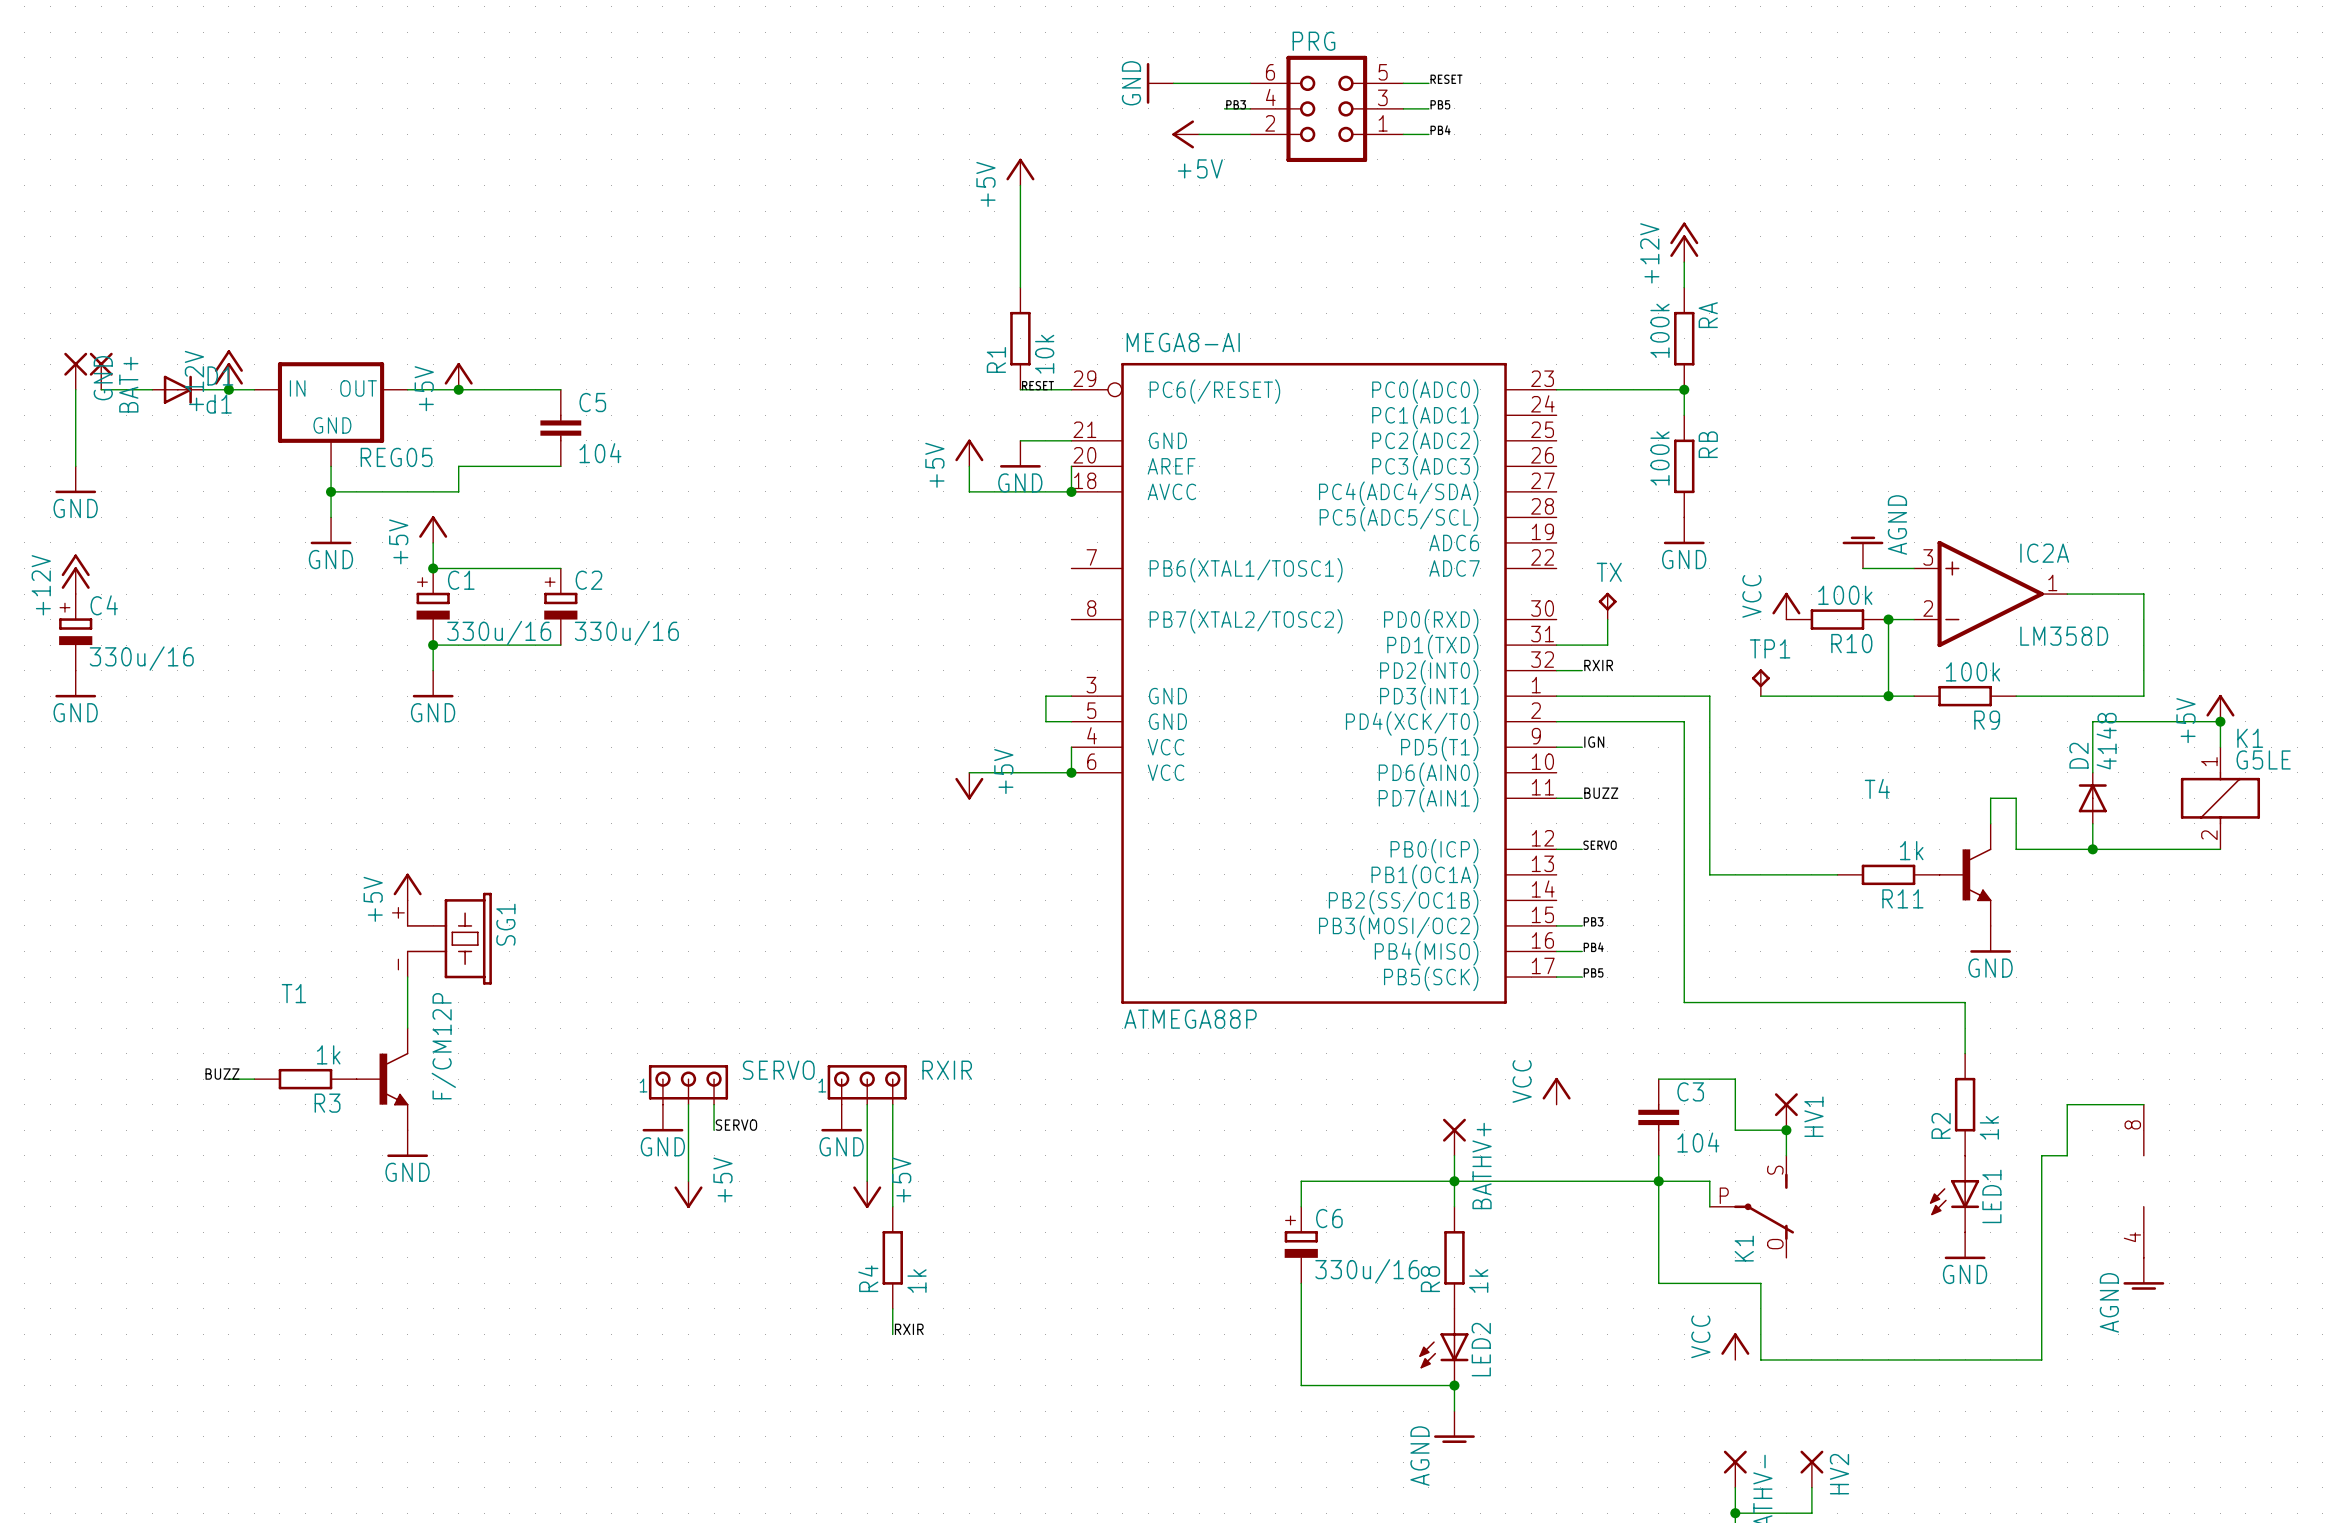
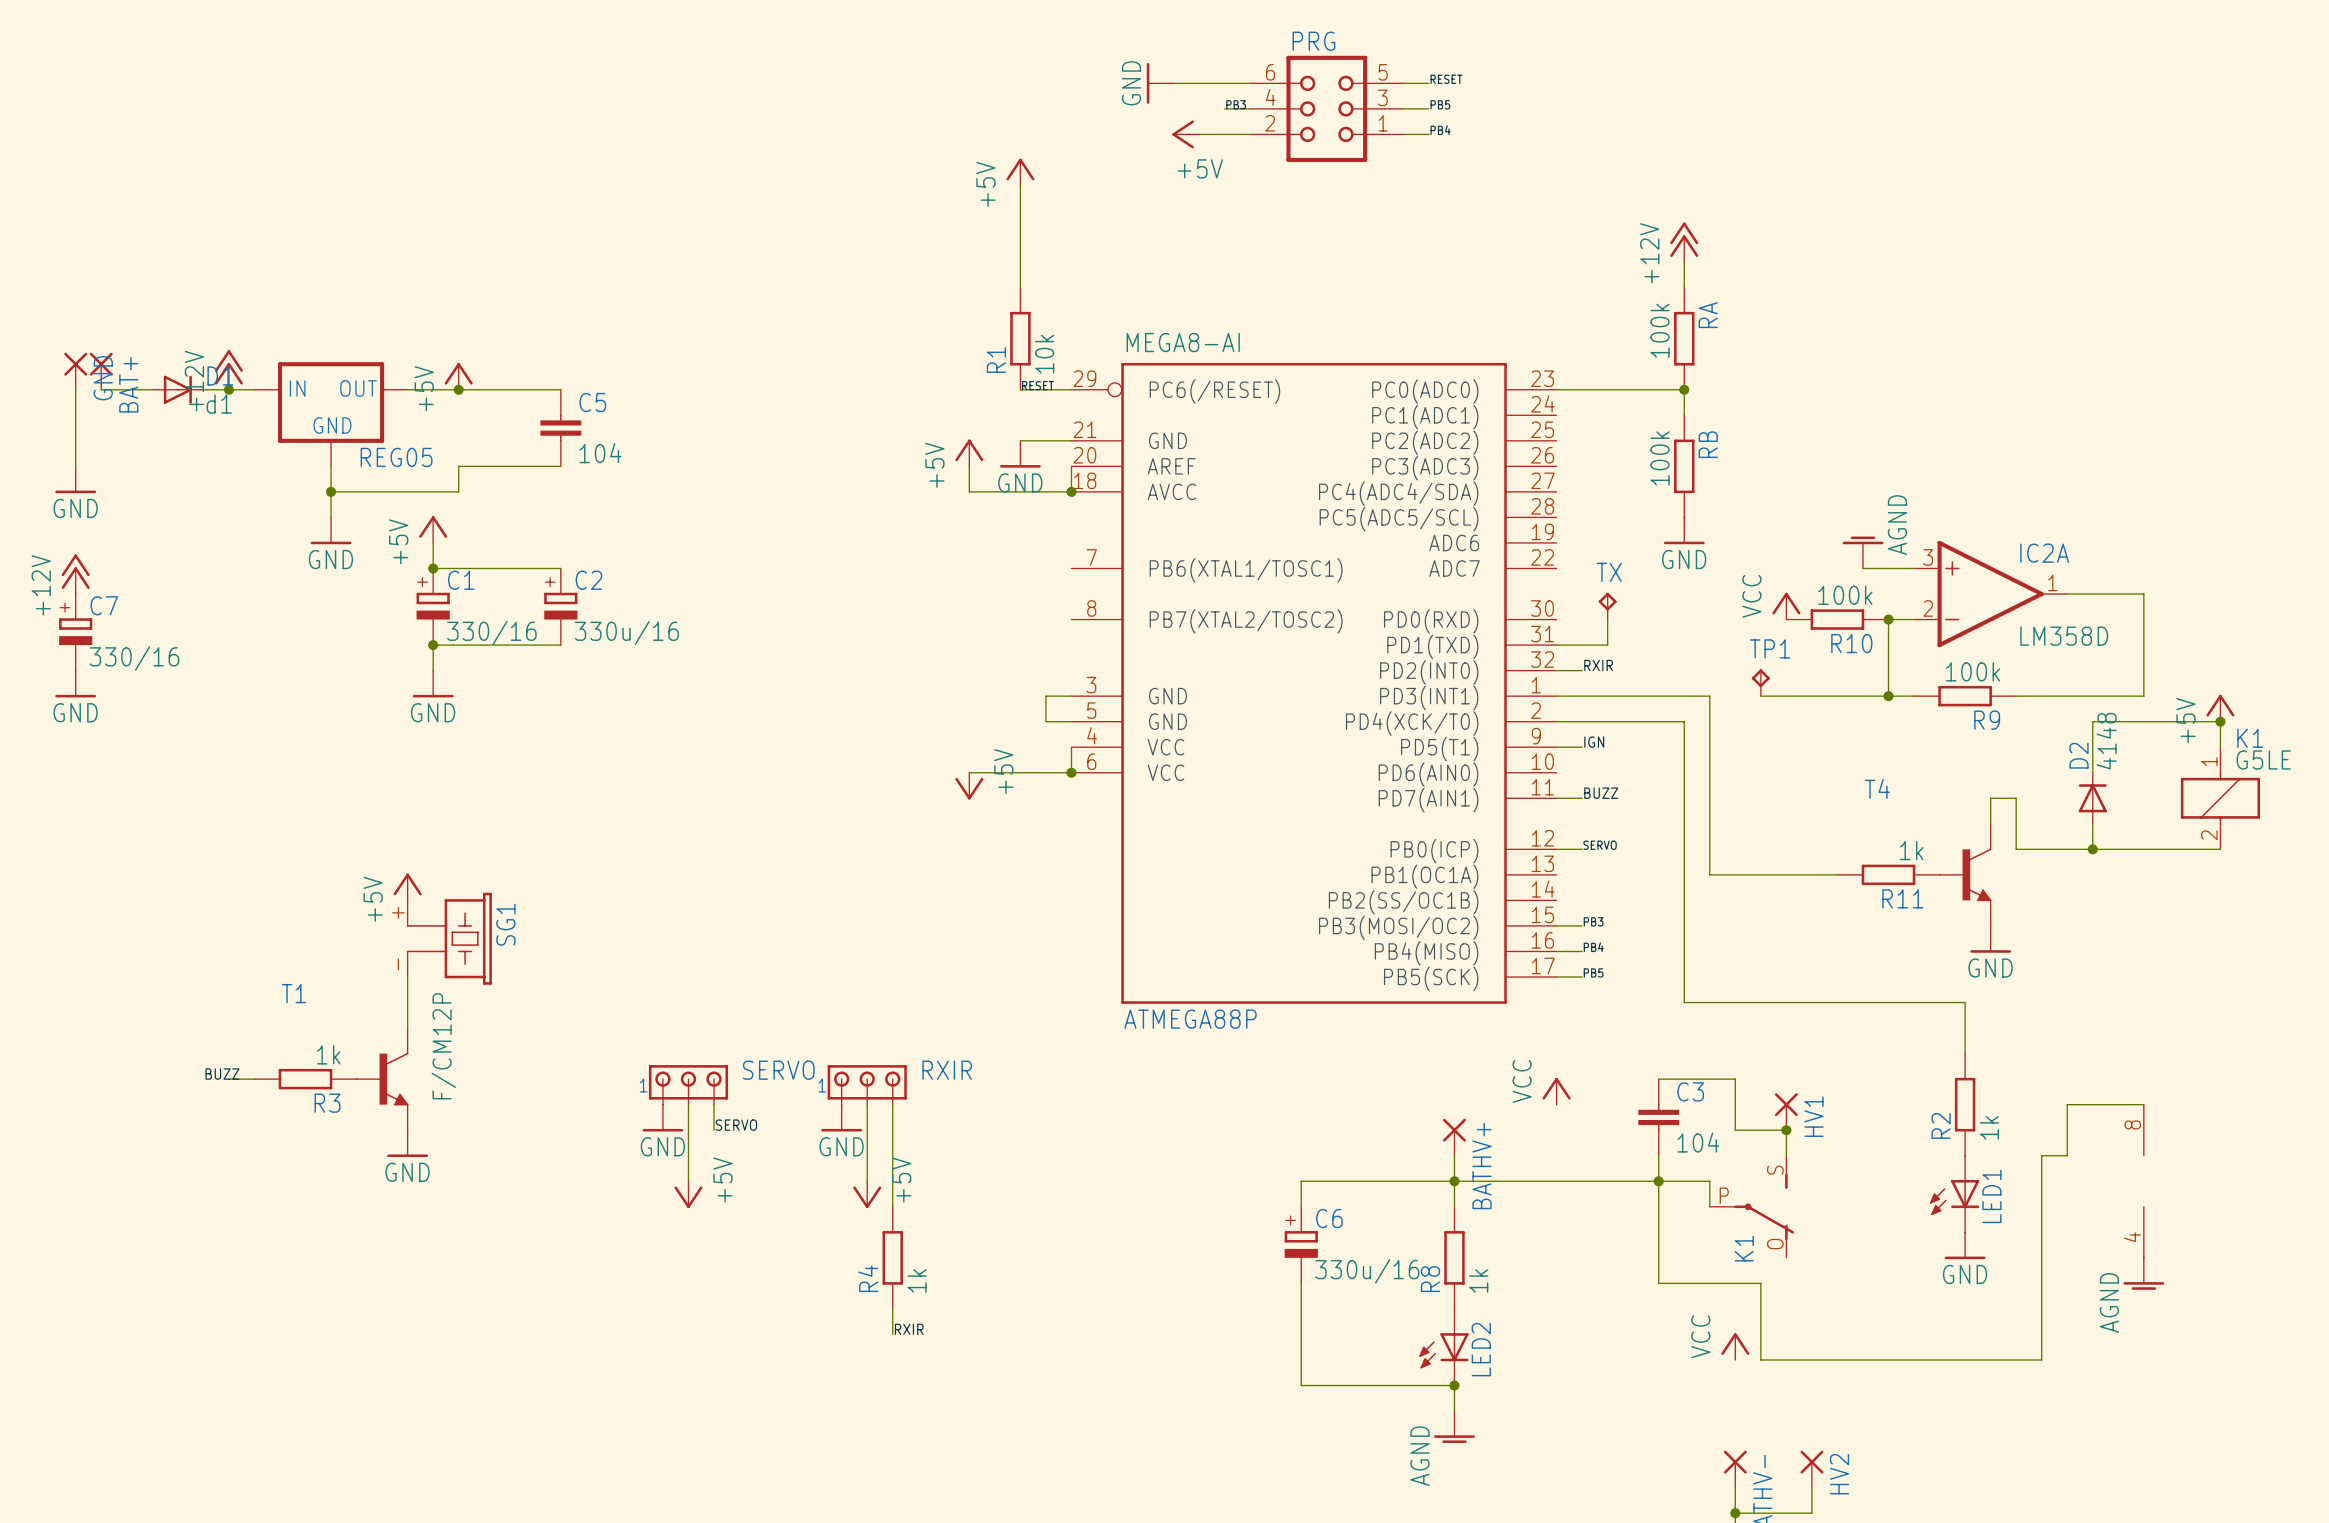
C4 name: C4 (104, 605) -> C7 (104, 605)
C1 value: 330u/16 (499, 633) -> 330/16 (491, 633)
C4 value: 330u/16 (141, 658) -> 330/16 (134, 658)

